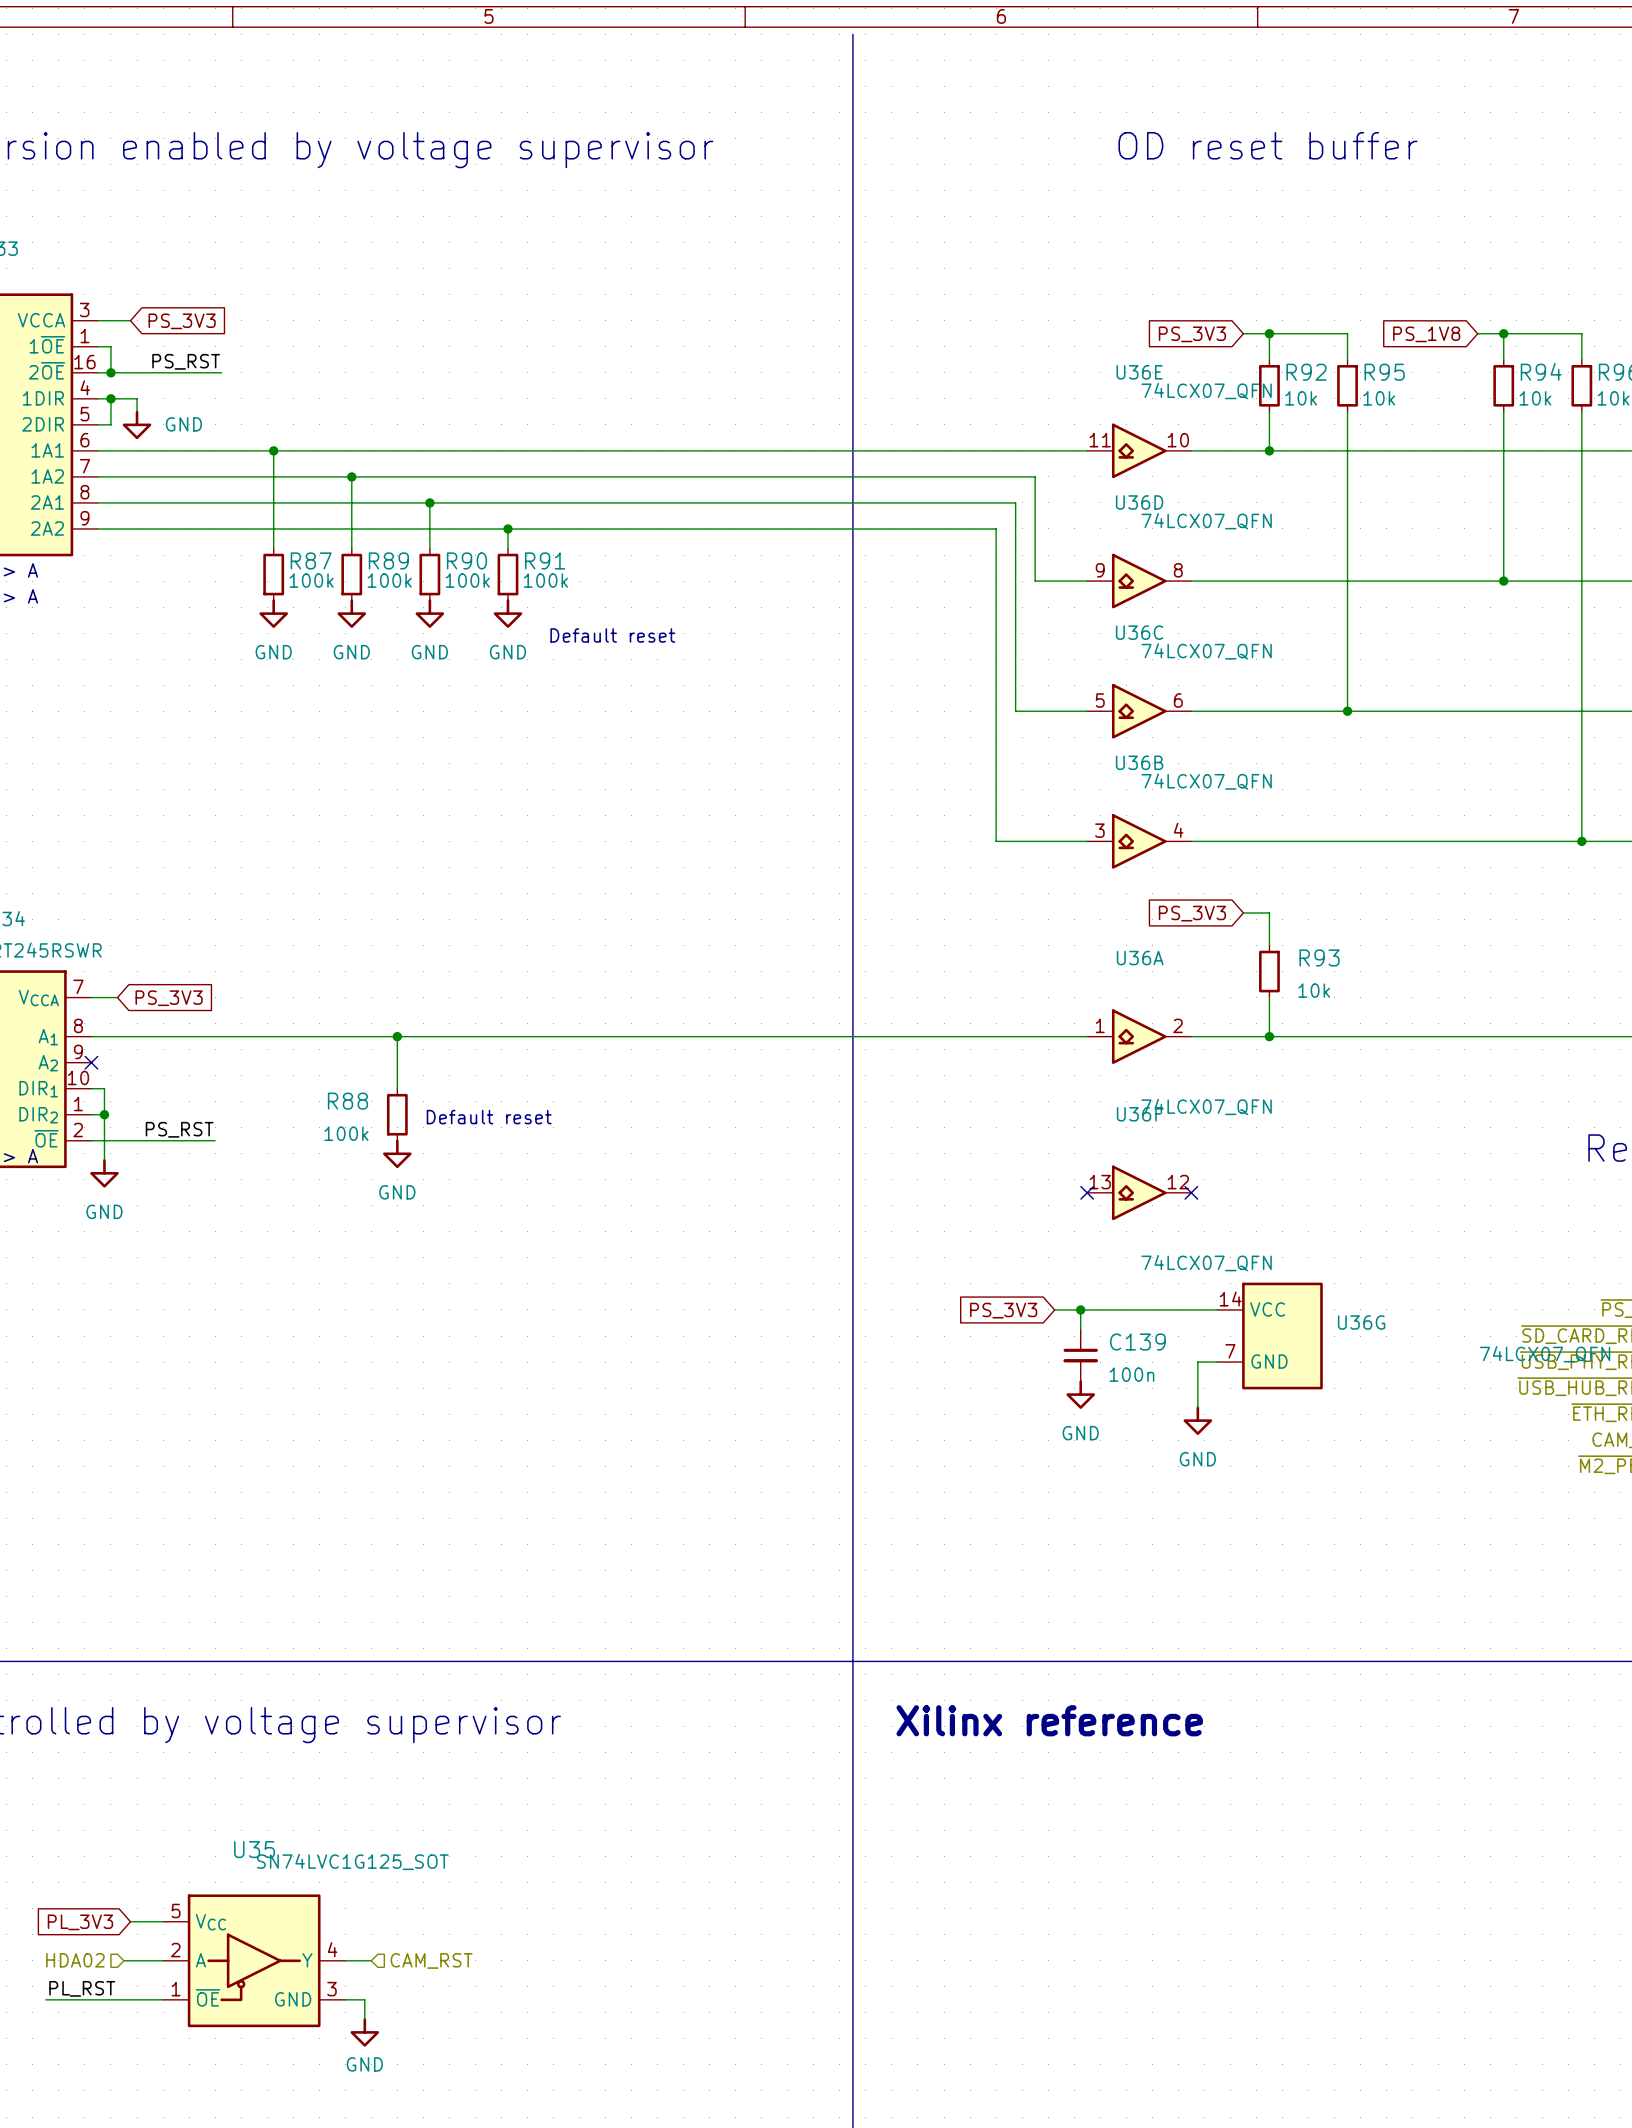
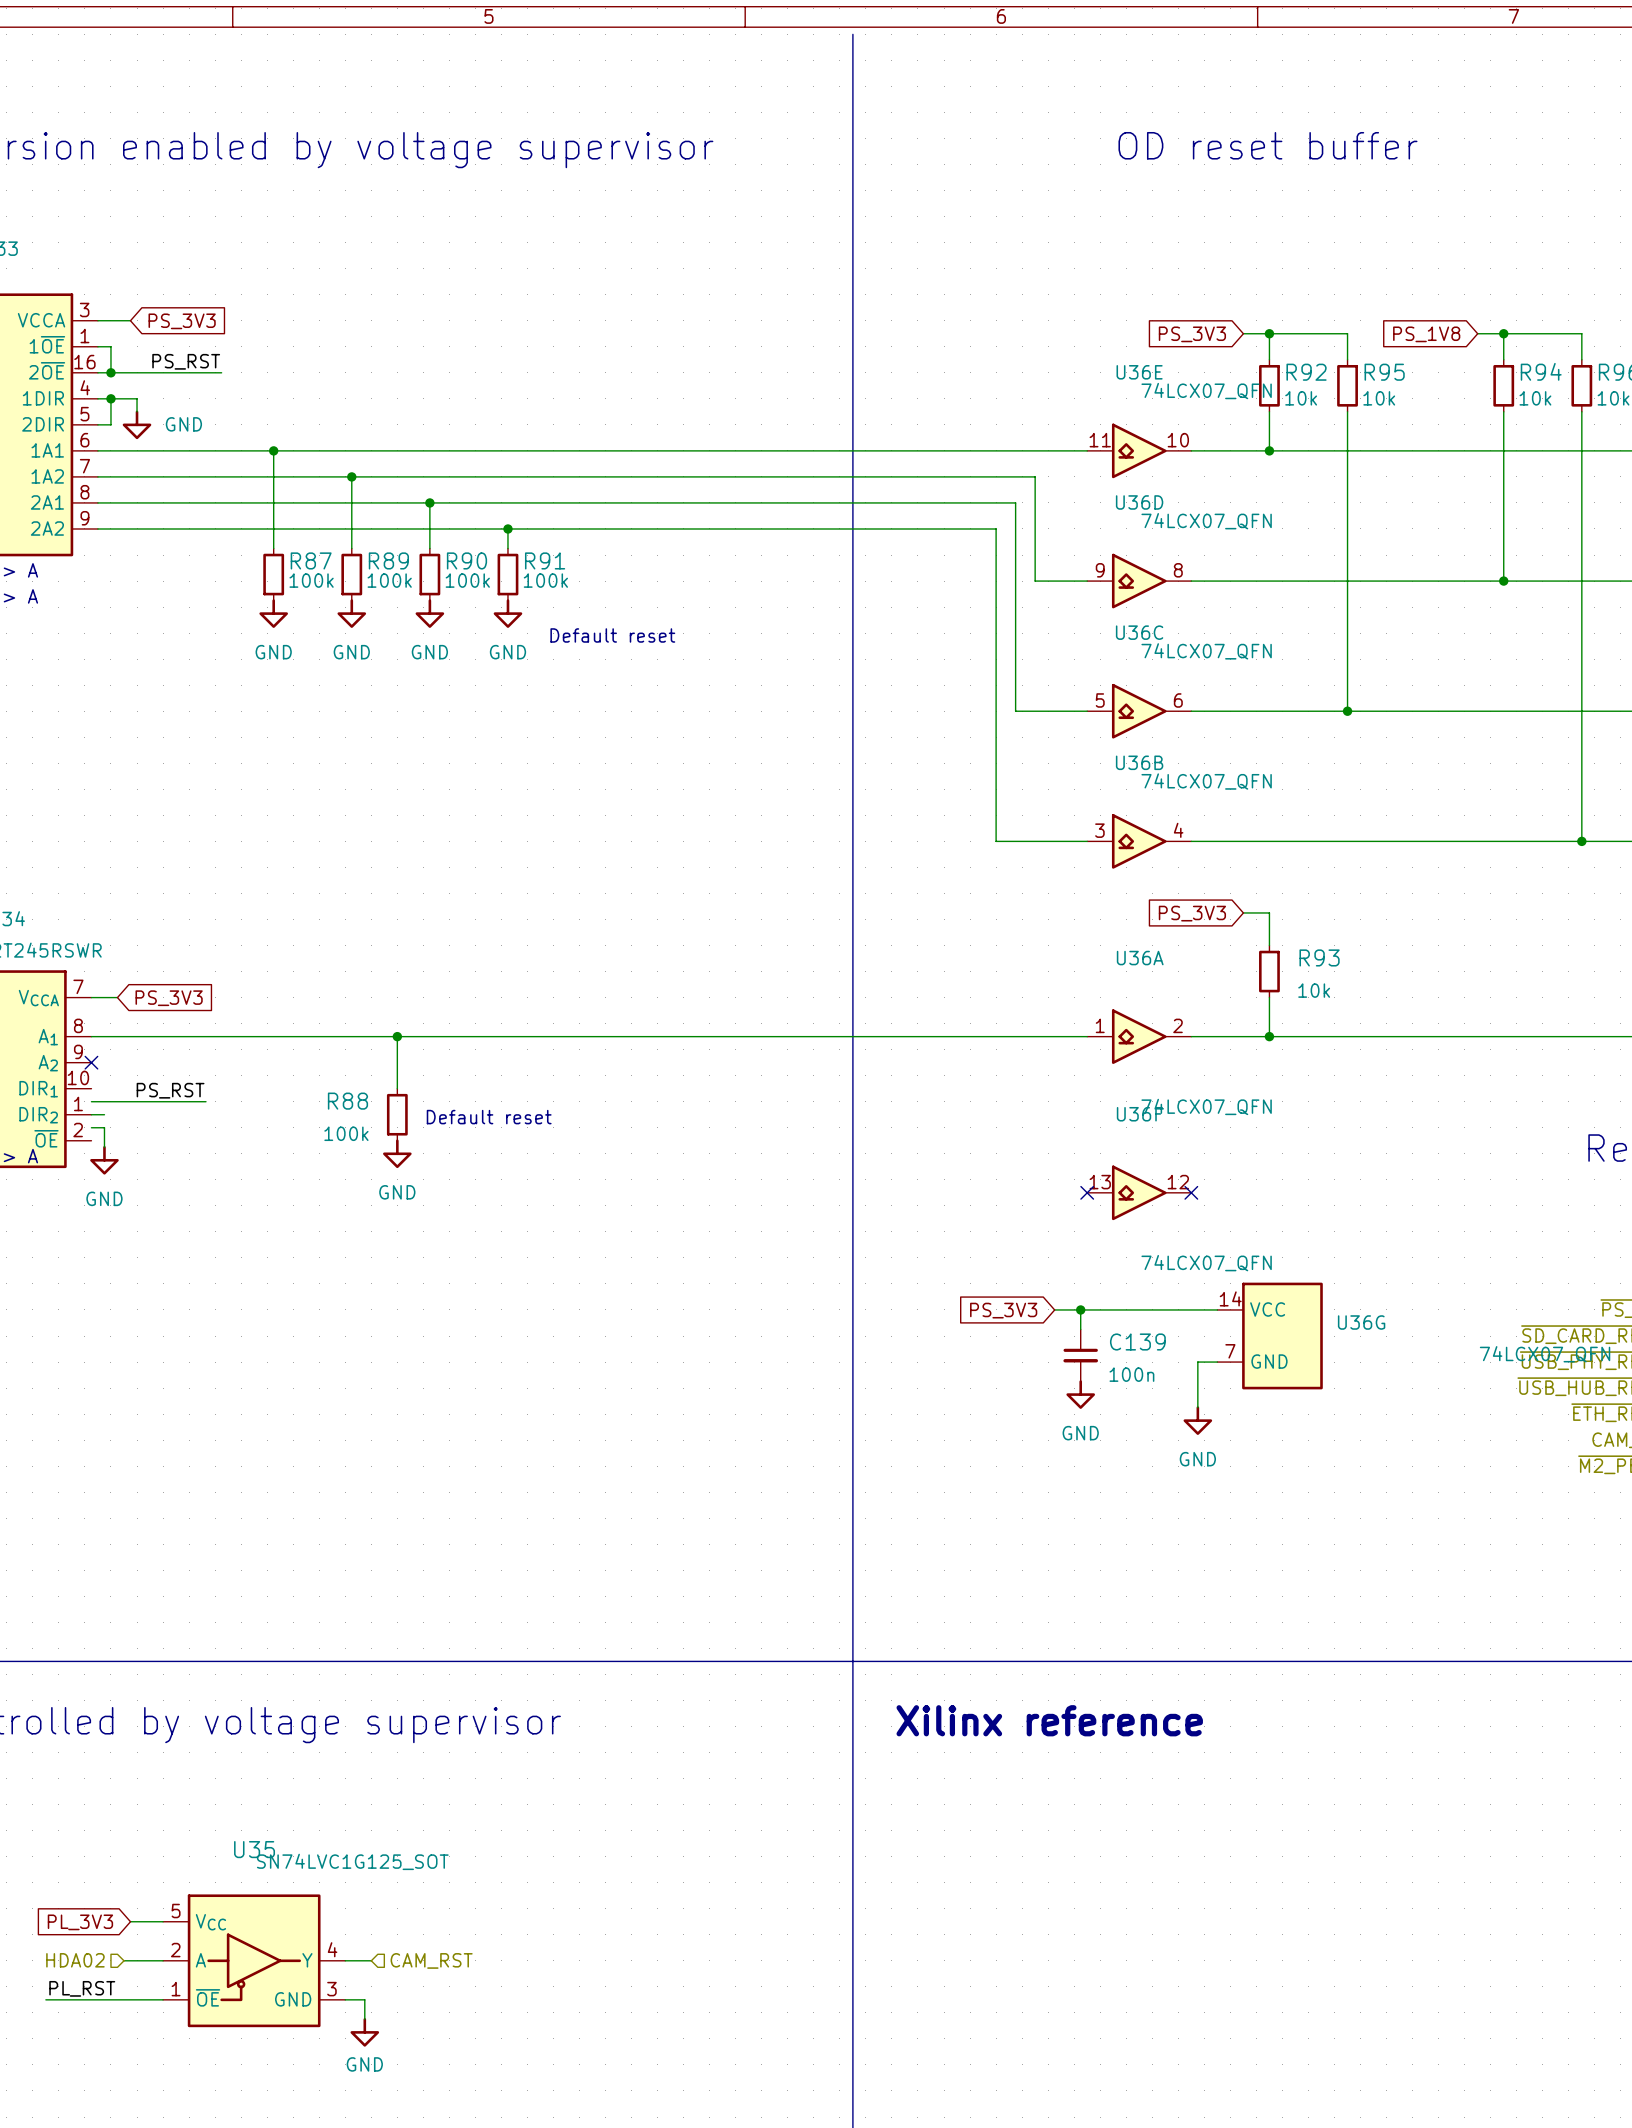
wire: (91, 1088) (104, 1088) (104, 1127) -> (91, 1127) (104, 1127)
wire: none -> (91, 1101) (206, 1101)
junction: (104, 1114) -> none
label position: PS_RST (179, 1129) -> PS_RST (170, 1090)
wire: (91, 1140) (215, 1140) -> none
power symbol position: GND (104, 1173) -> GND (104, 1160)

